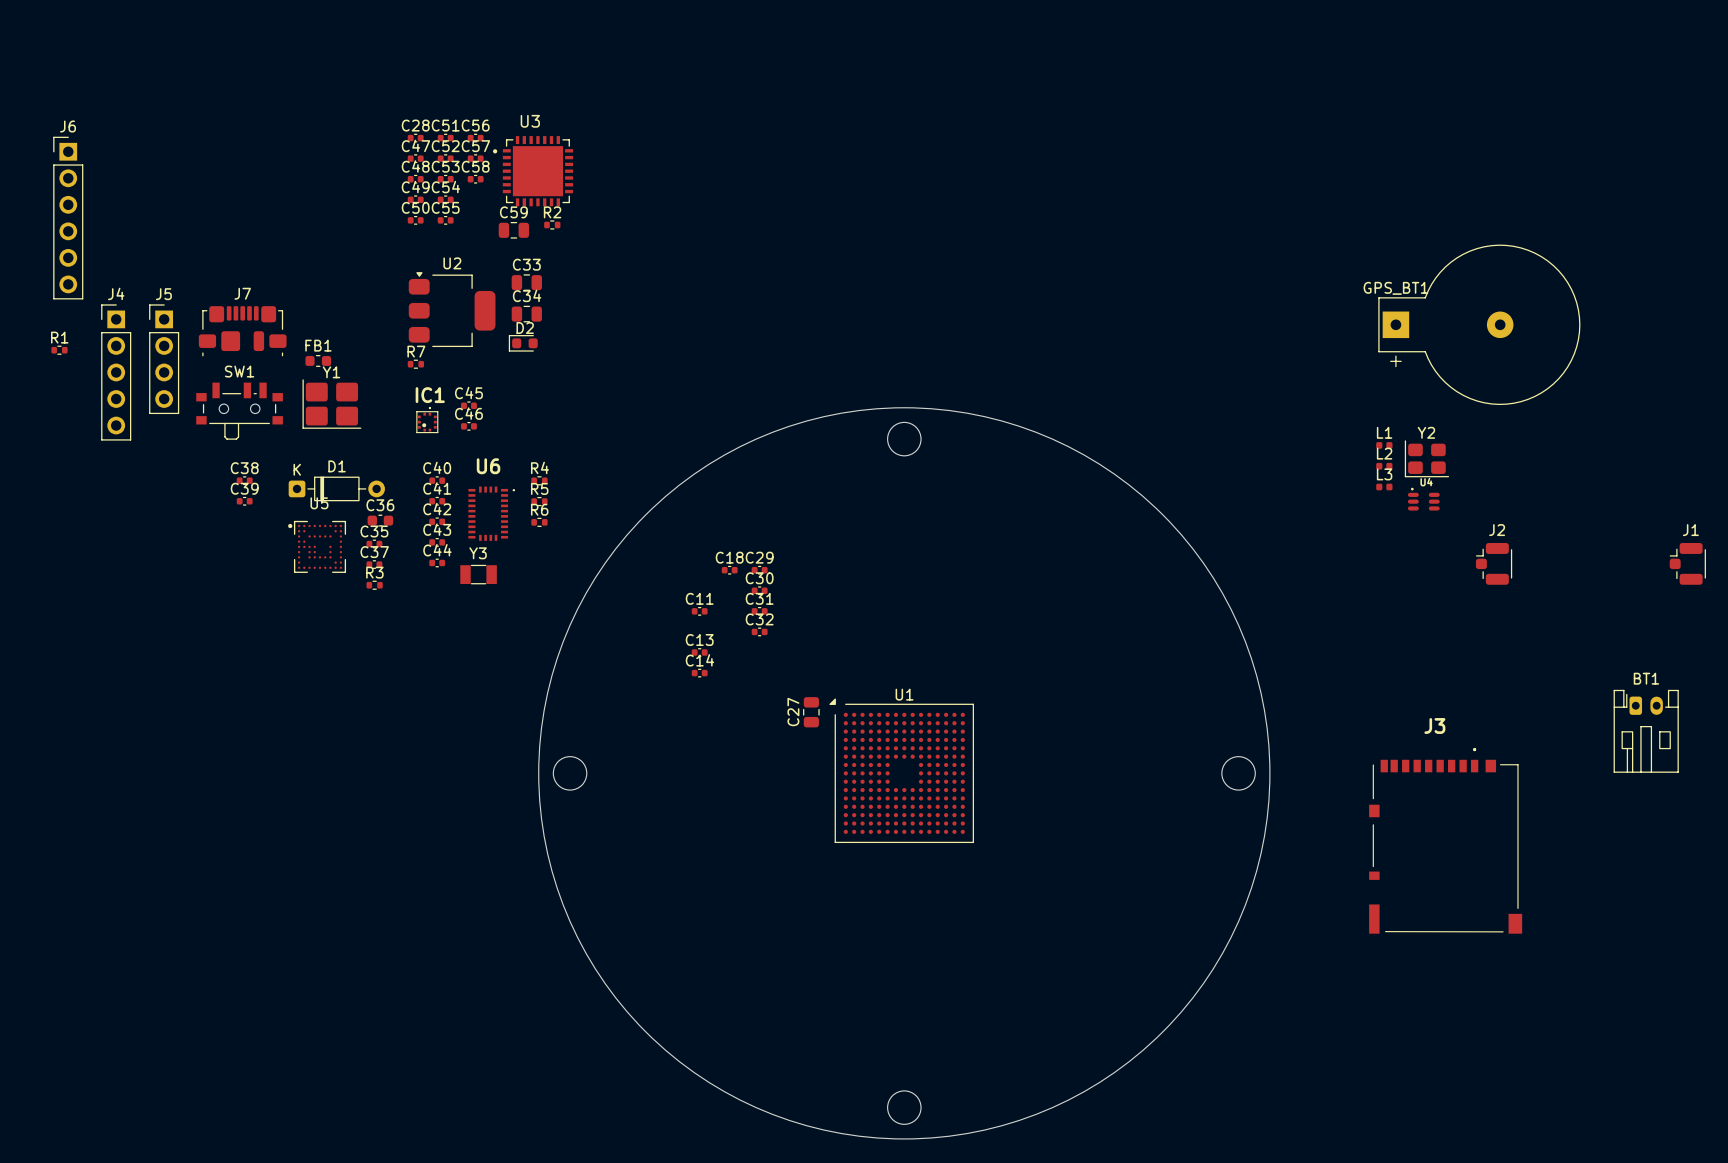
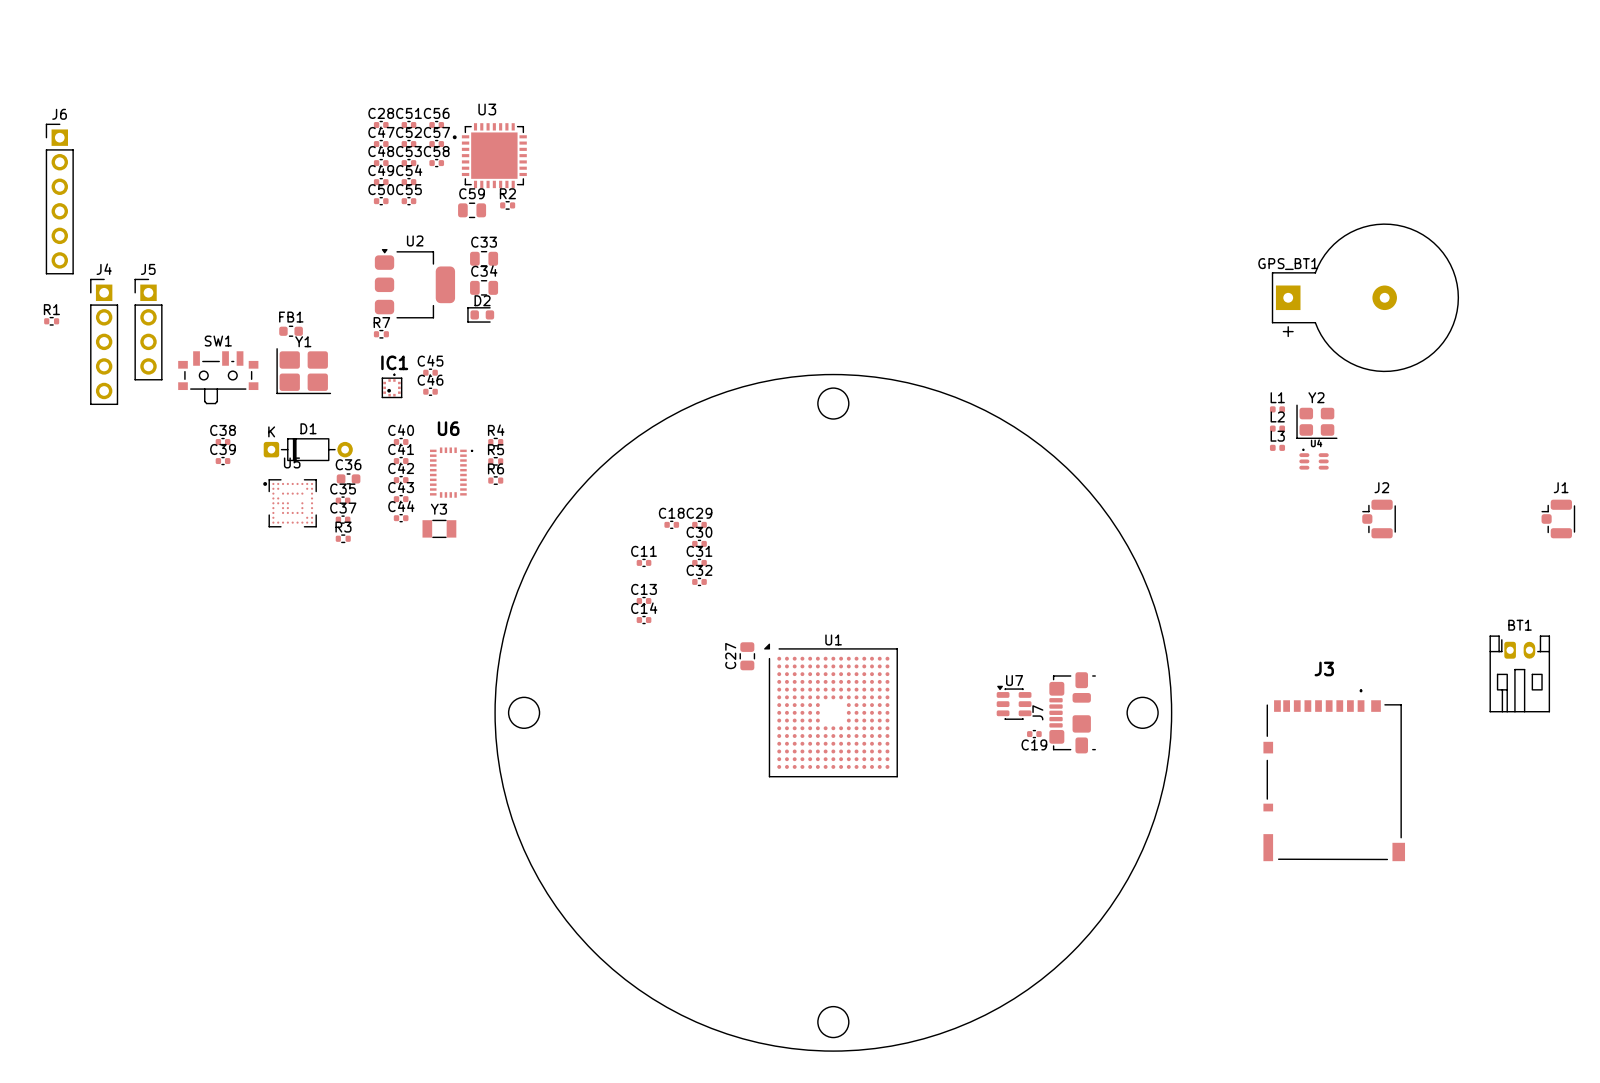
J7 rotation: 0° (242, 331) -> 90° counterclockwise (1072, 712)
J7 position: (242, 331) -> (1072, 712)
U7: none -> (1014, 702)
C19: none -> (1034, 734)

